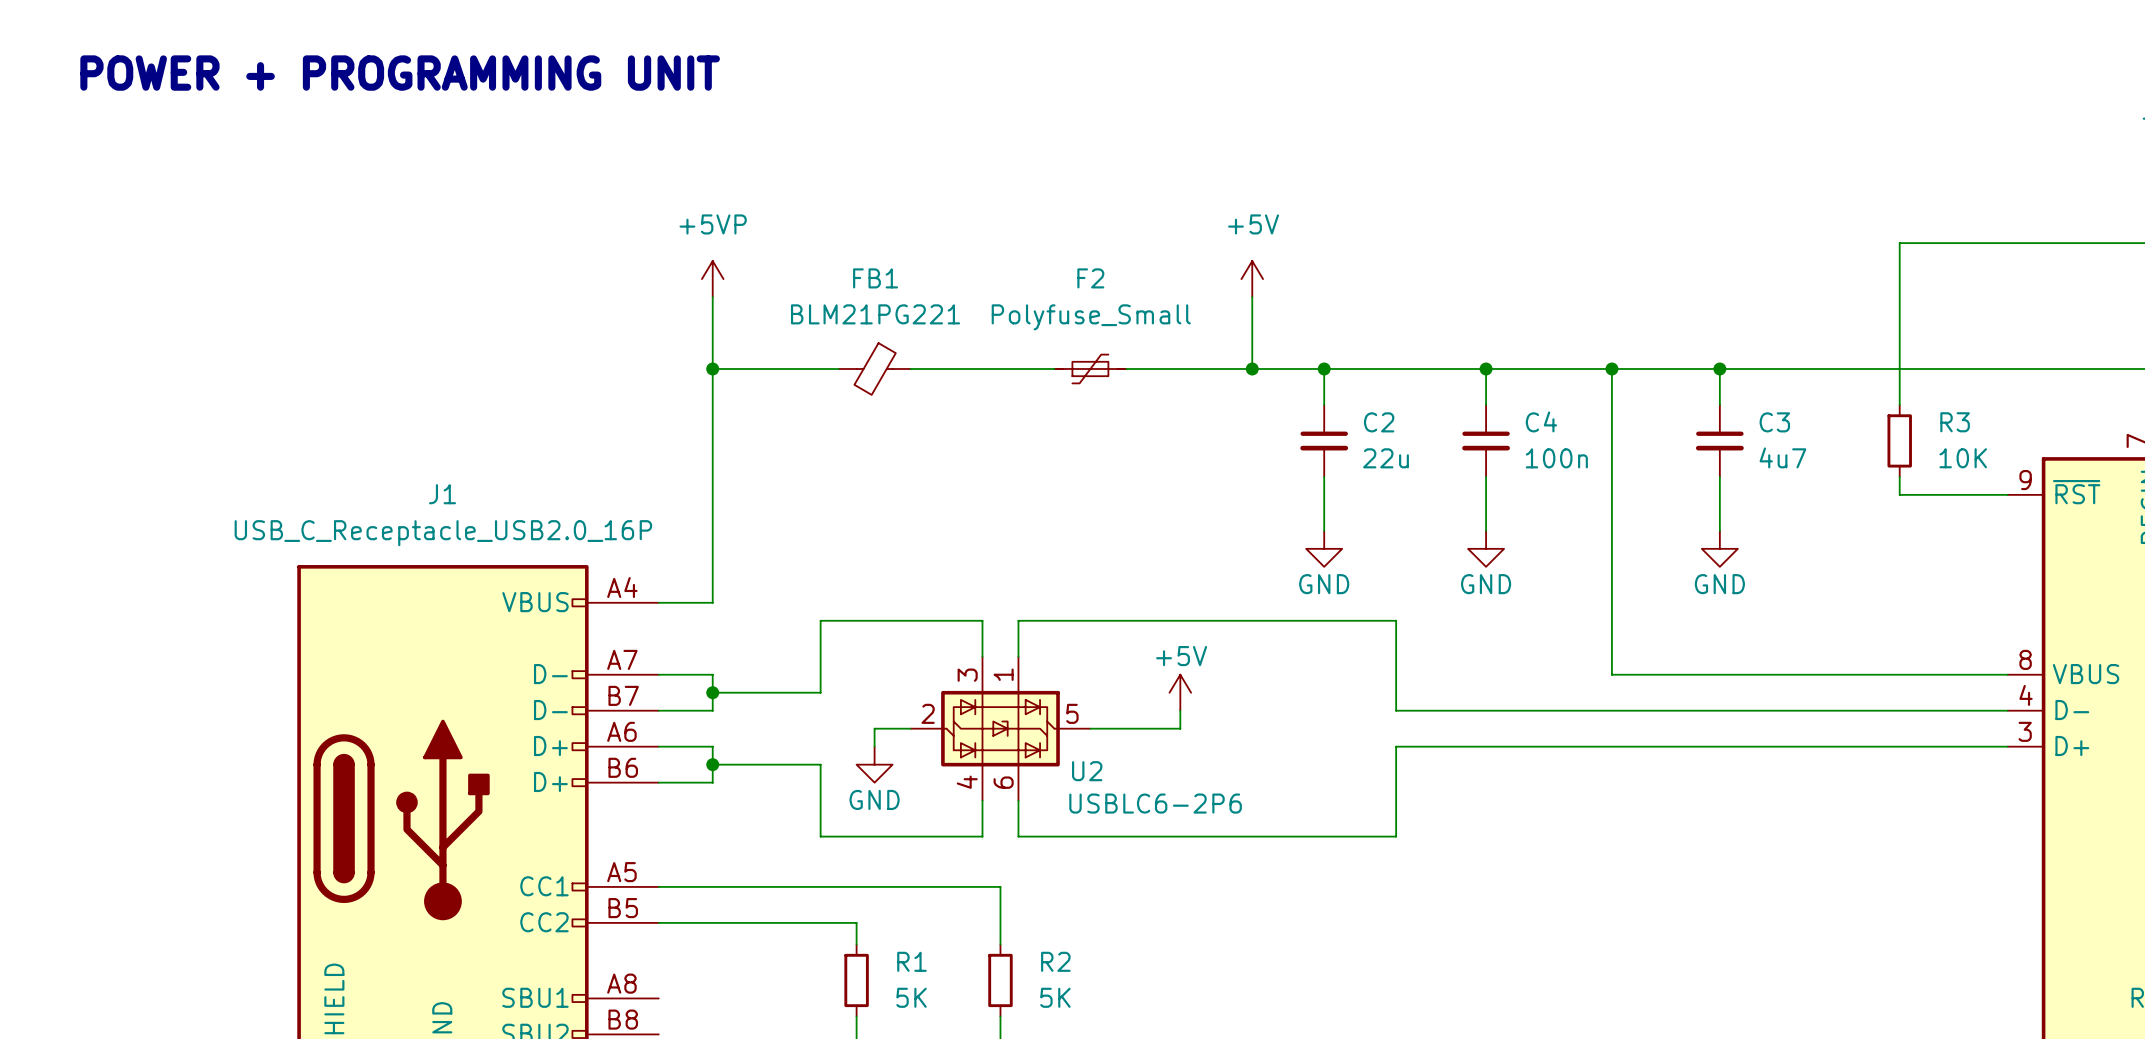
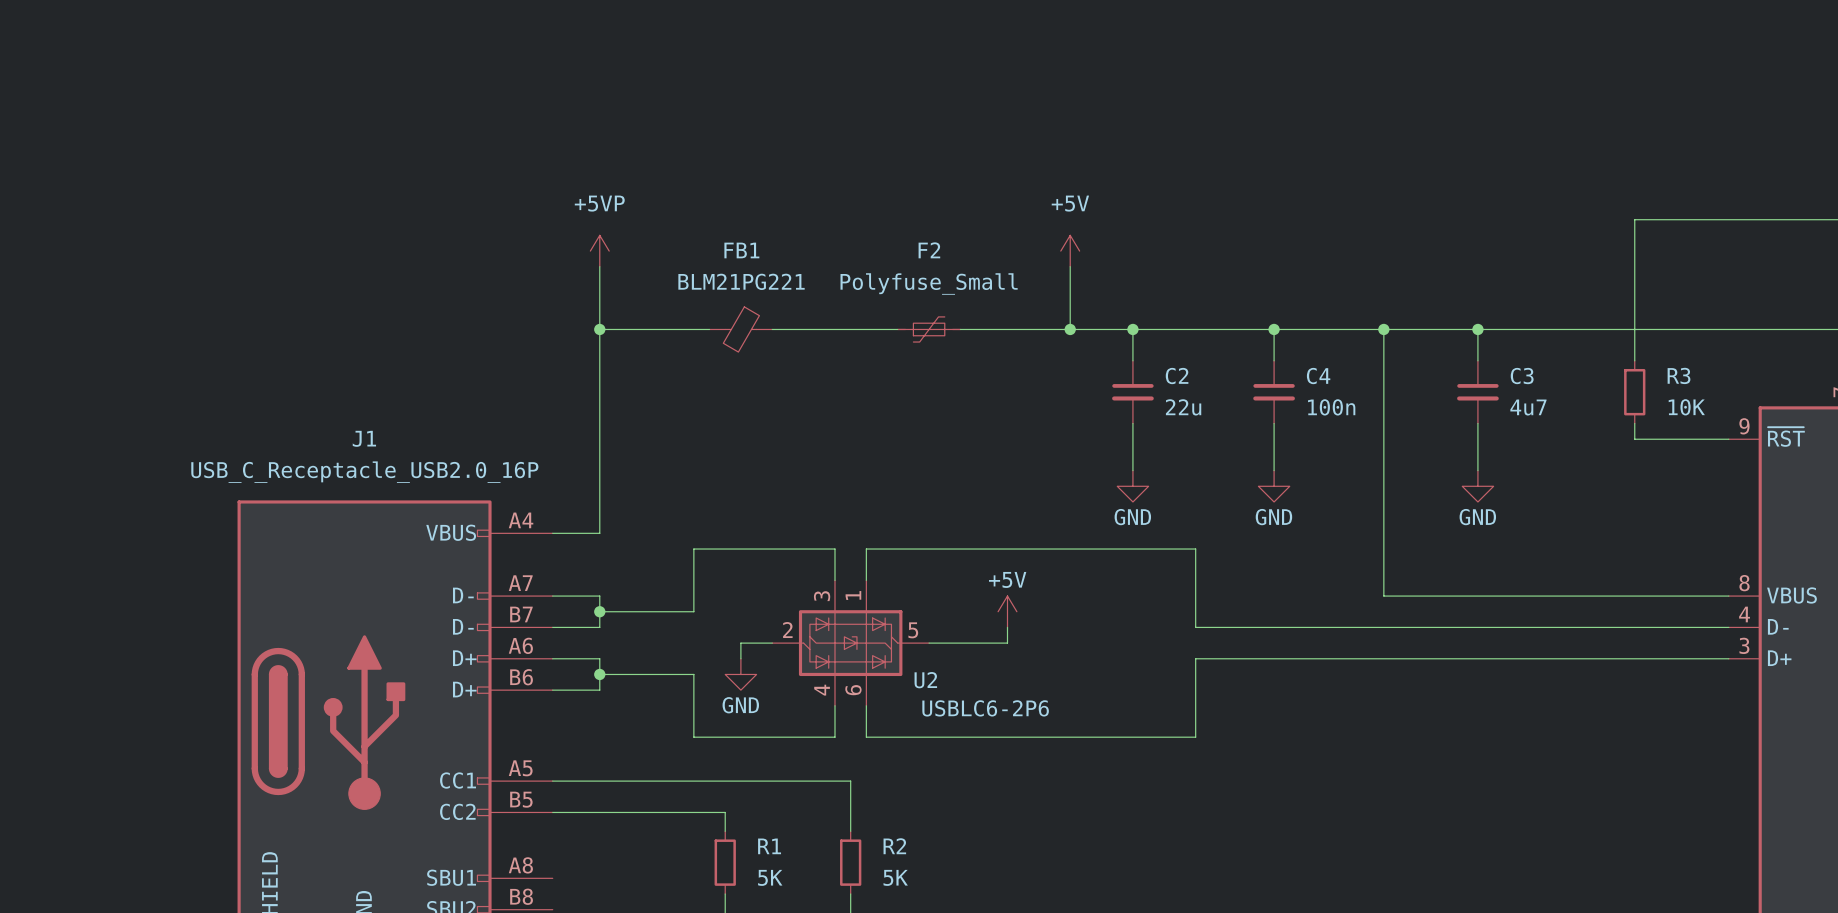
text: POWER + PROGRAMMING UNIT (400, 73) -> none

